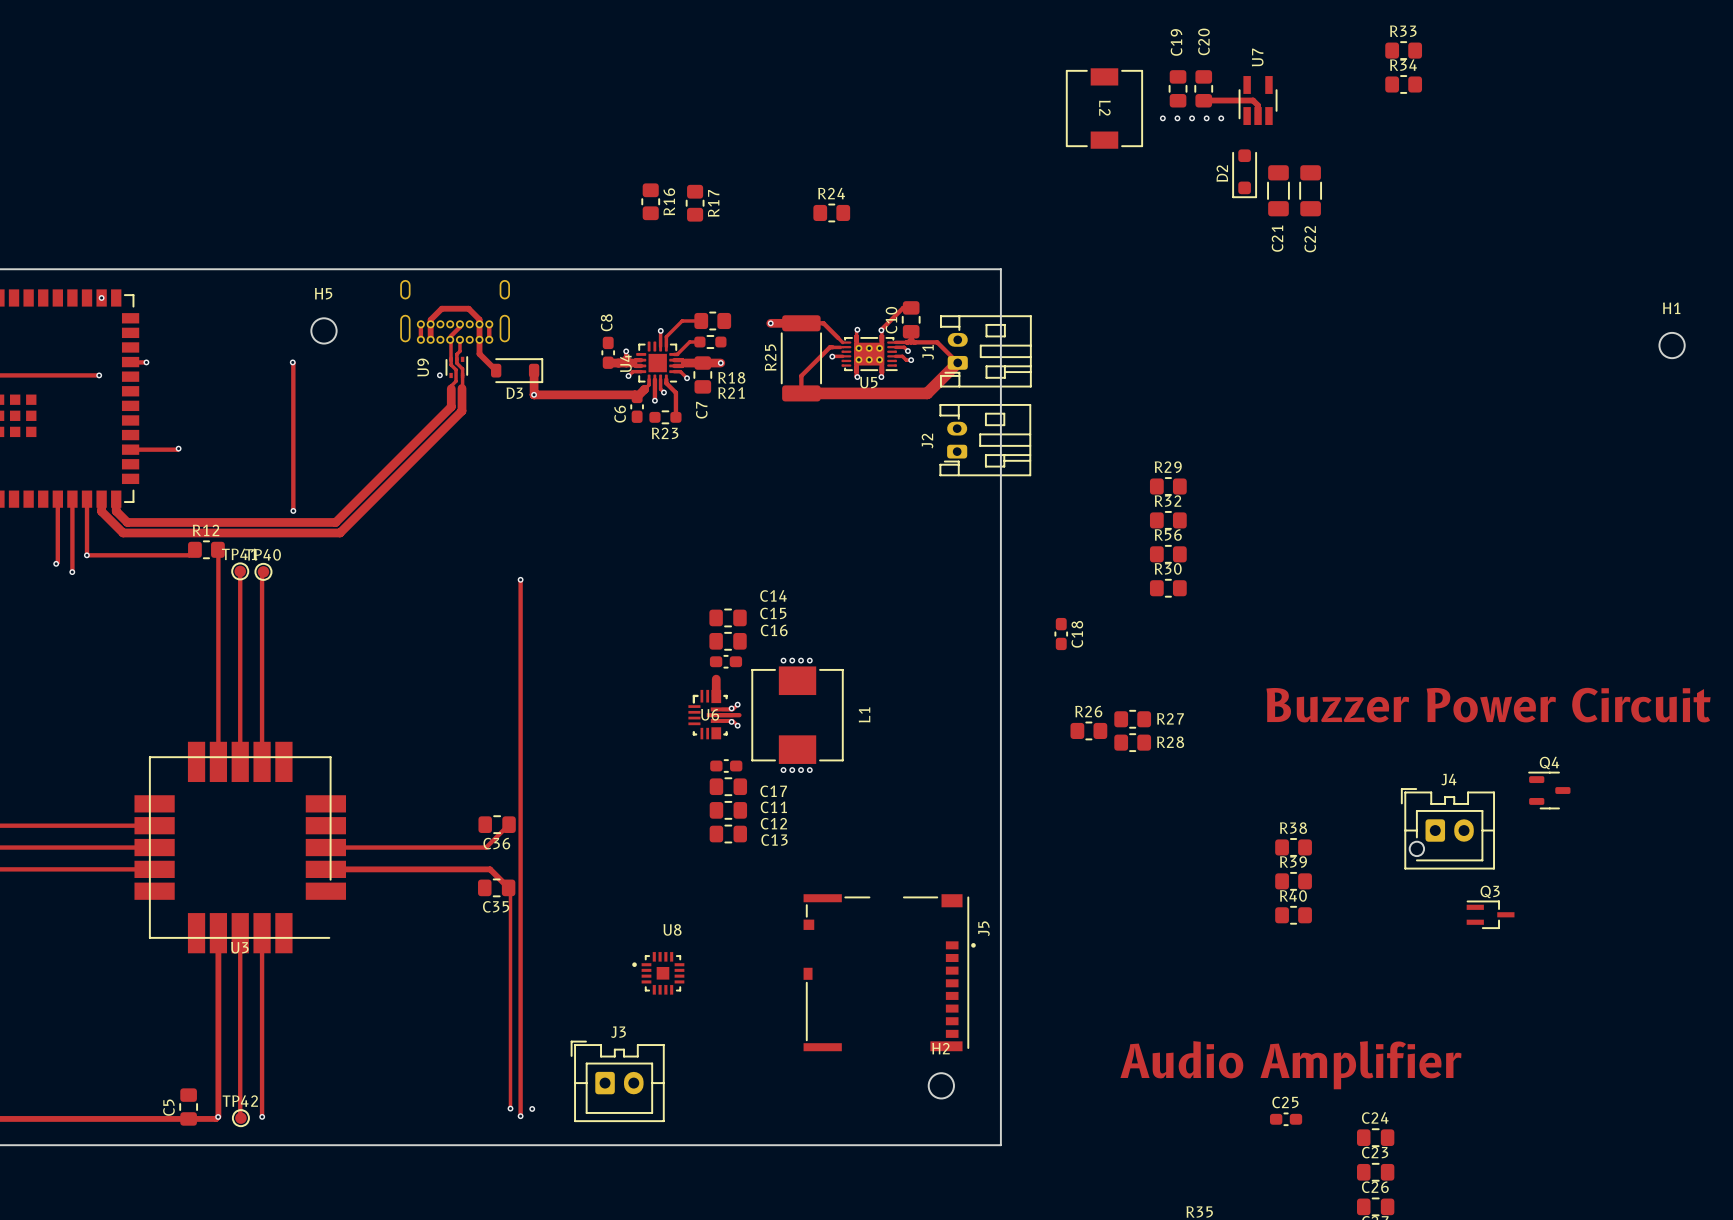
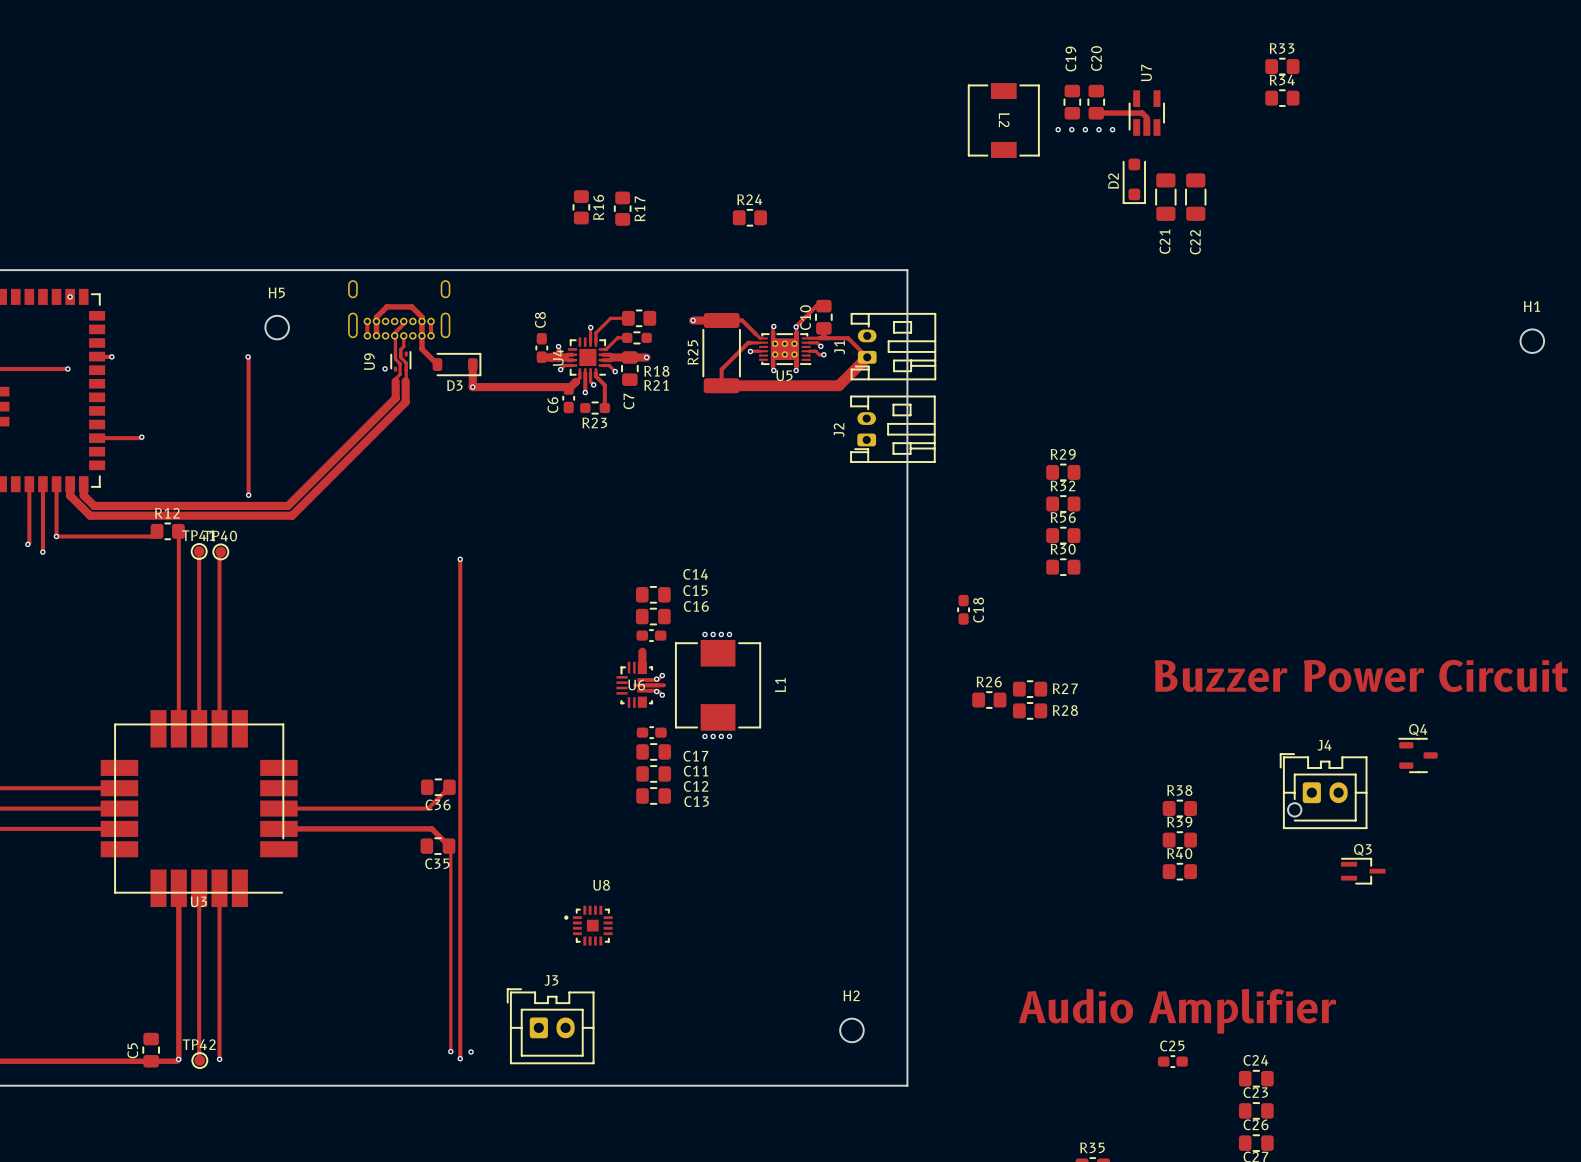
J5: (889, 972) -> none

